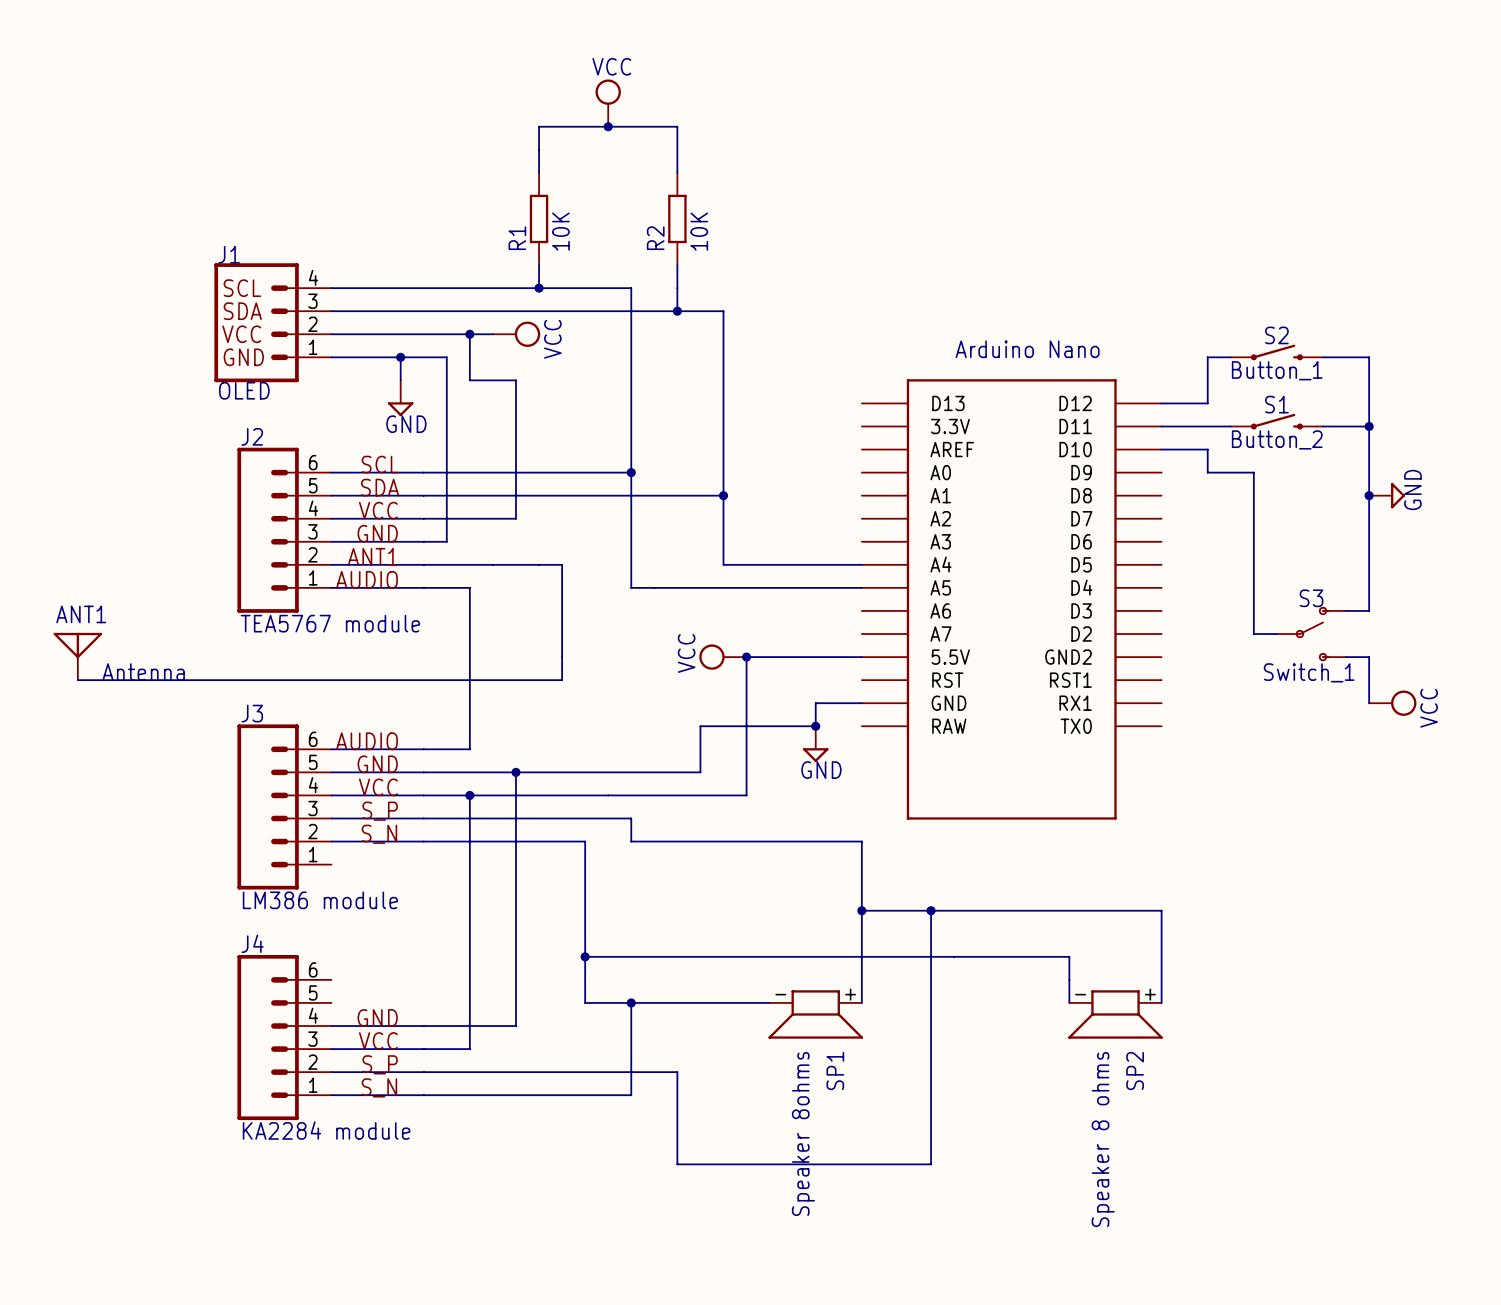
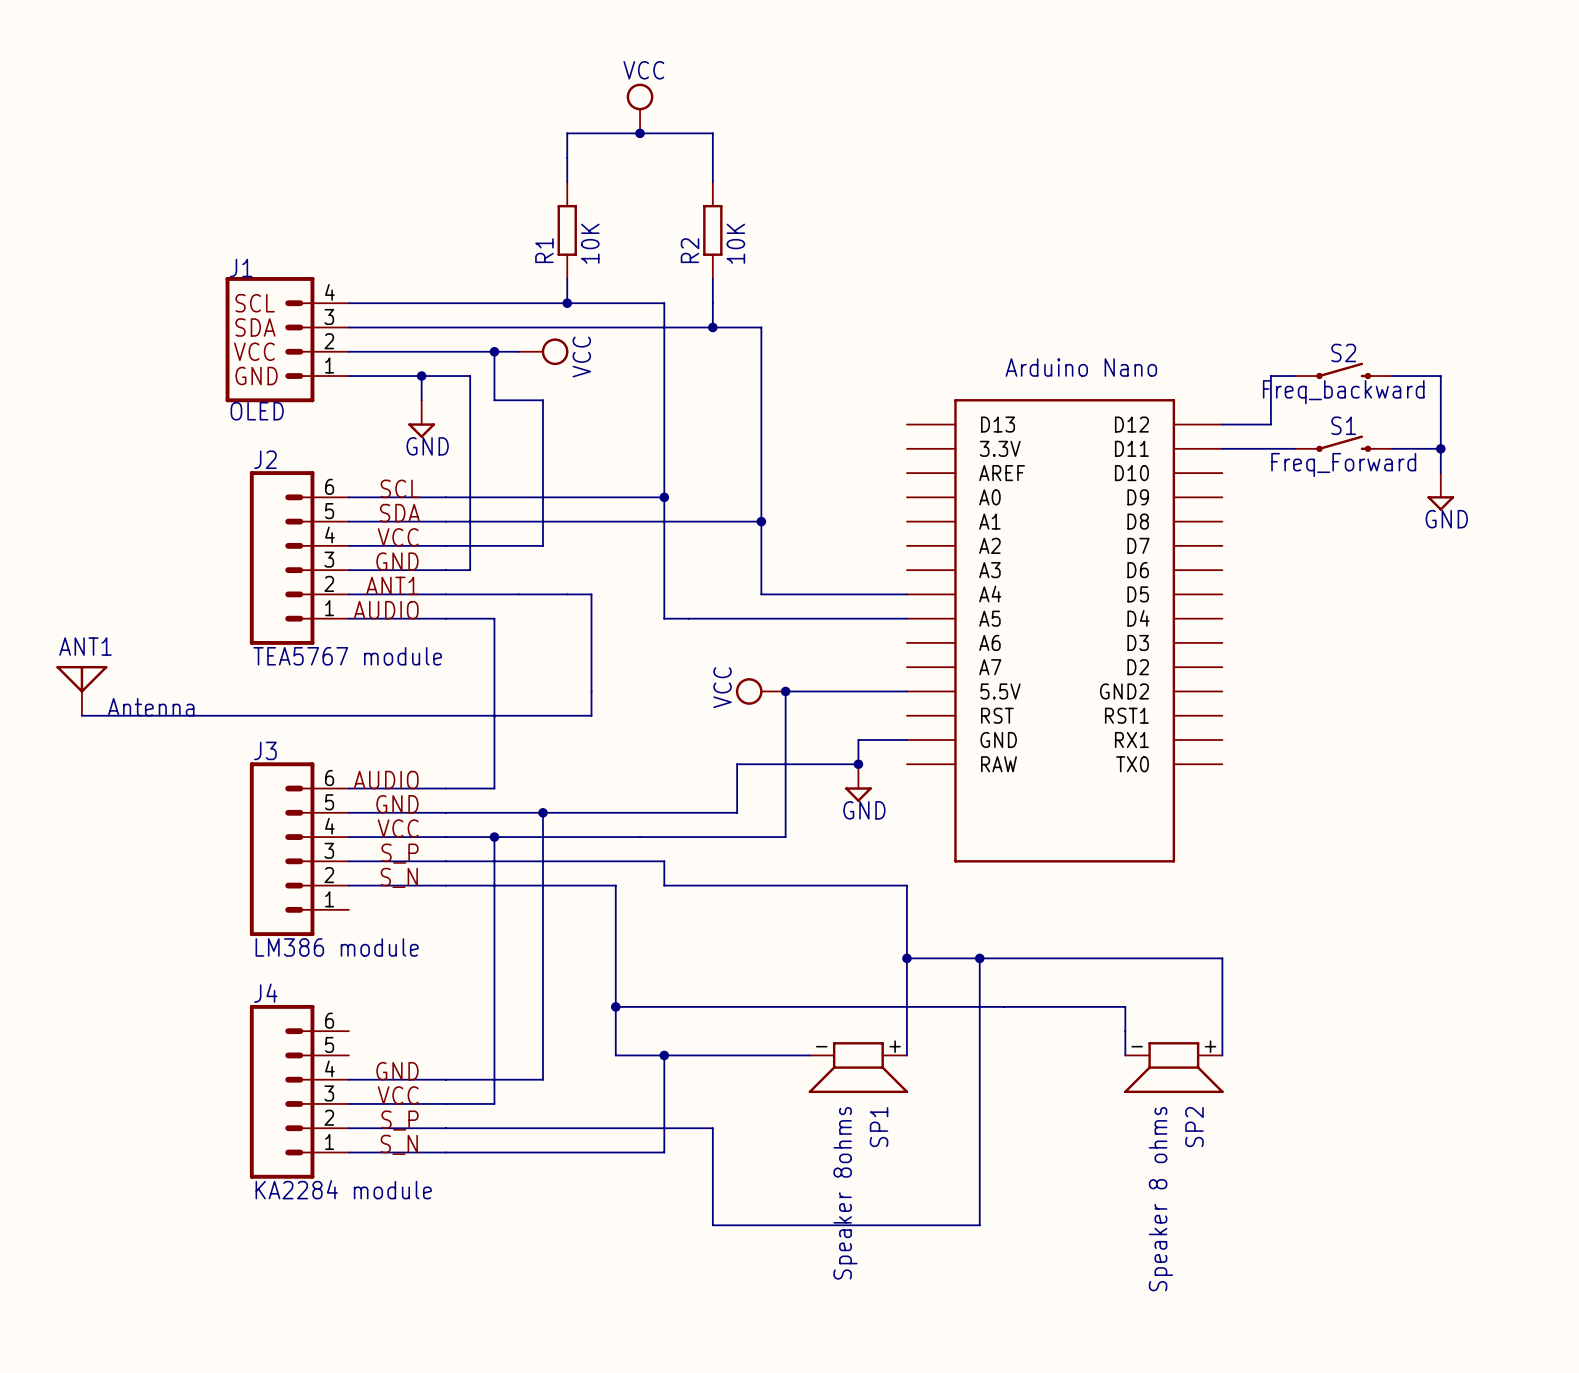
S2 value: Button_1 (1277, 370) -> Freq_backward (1343, 392)
S1 value: Button_2 (1277, 439) -> Freq_Forward (1343, 464)
wire: (1161, 449) (1207, 449) (1207, 472) (1253, 472) (1253, 634) (1276, 634) -> none
wire: (1369, 449) (1369, 610) (1346, 610) -> none
junction: (1369, 495) -> none
power symbol position: GND (1387, 495) -> GND (1440, 491)
power symbol rotation: 0° (1397, 495) -> 90° clockwise (1440, 503)
S3: Switch_1 (1311, 634) -> none
wire: (1346, 657) (1369, 657) (1369, 703) -> none
power symbol: VCC (1392, 703) -> none

